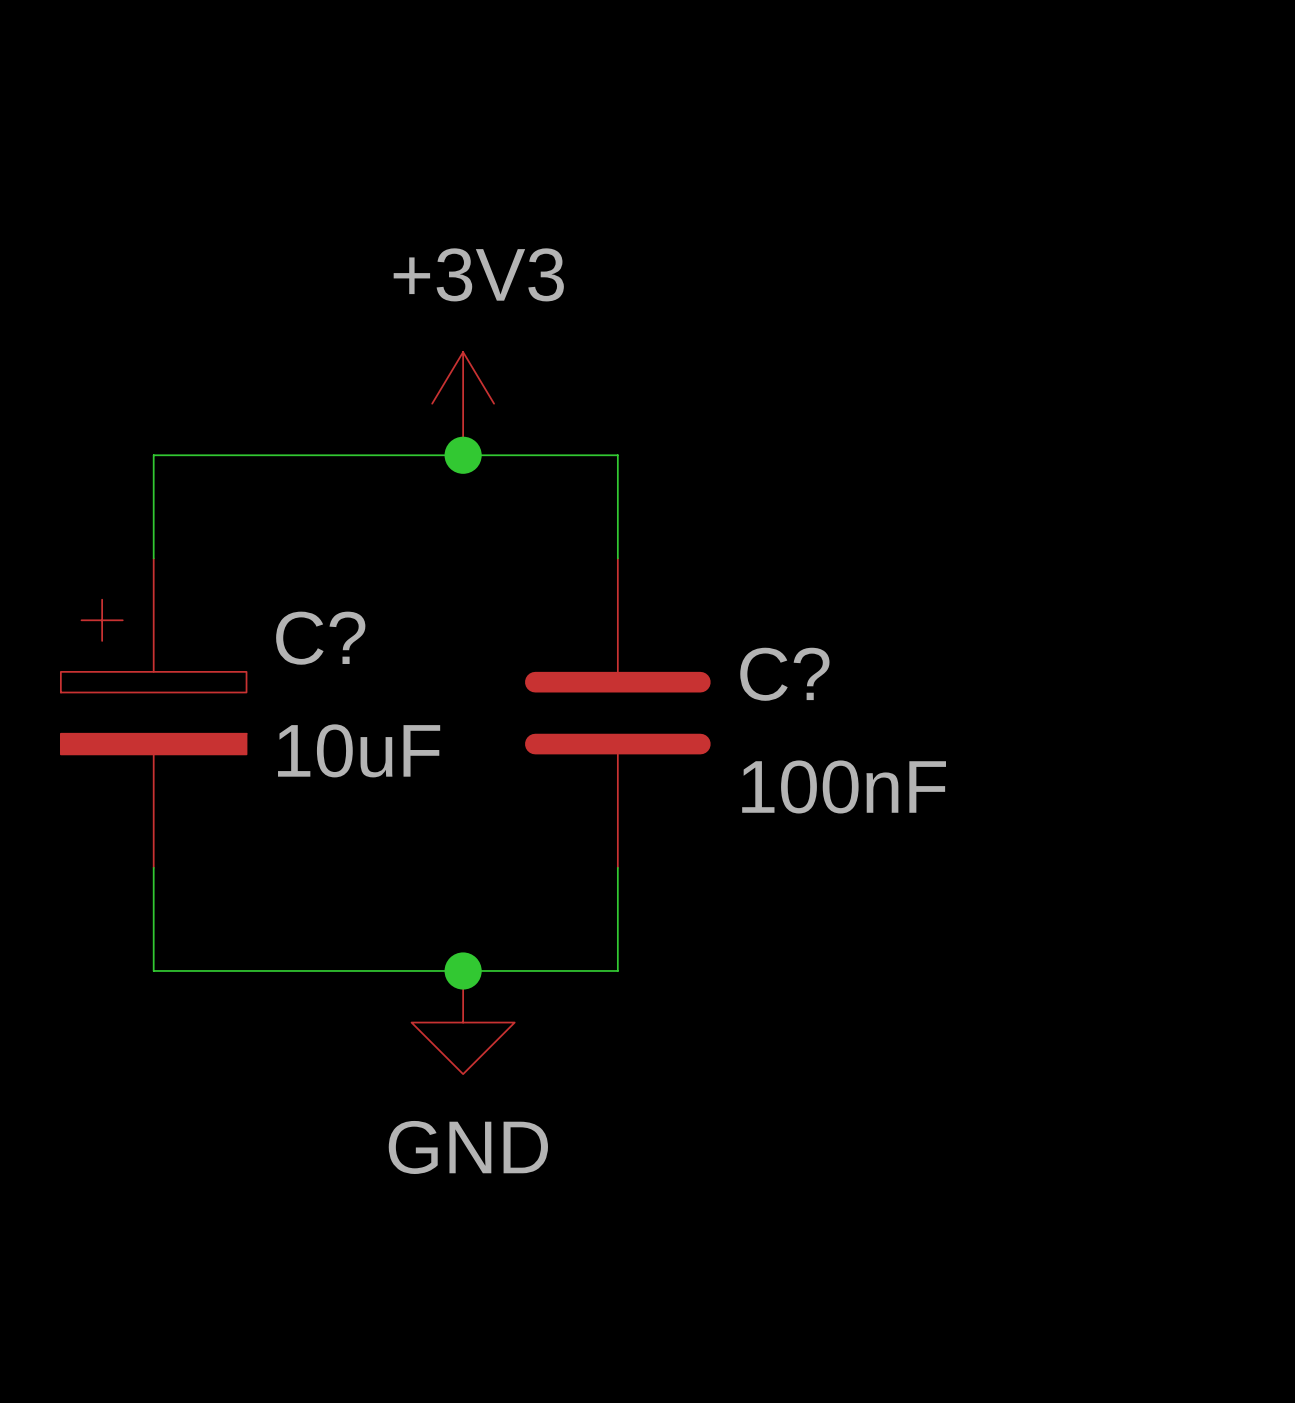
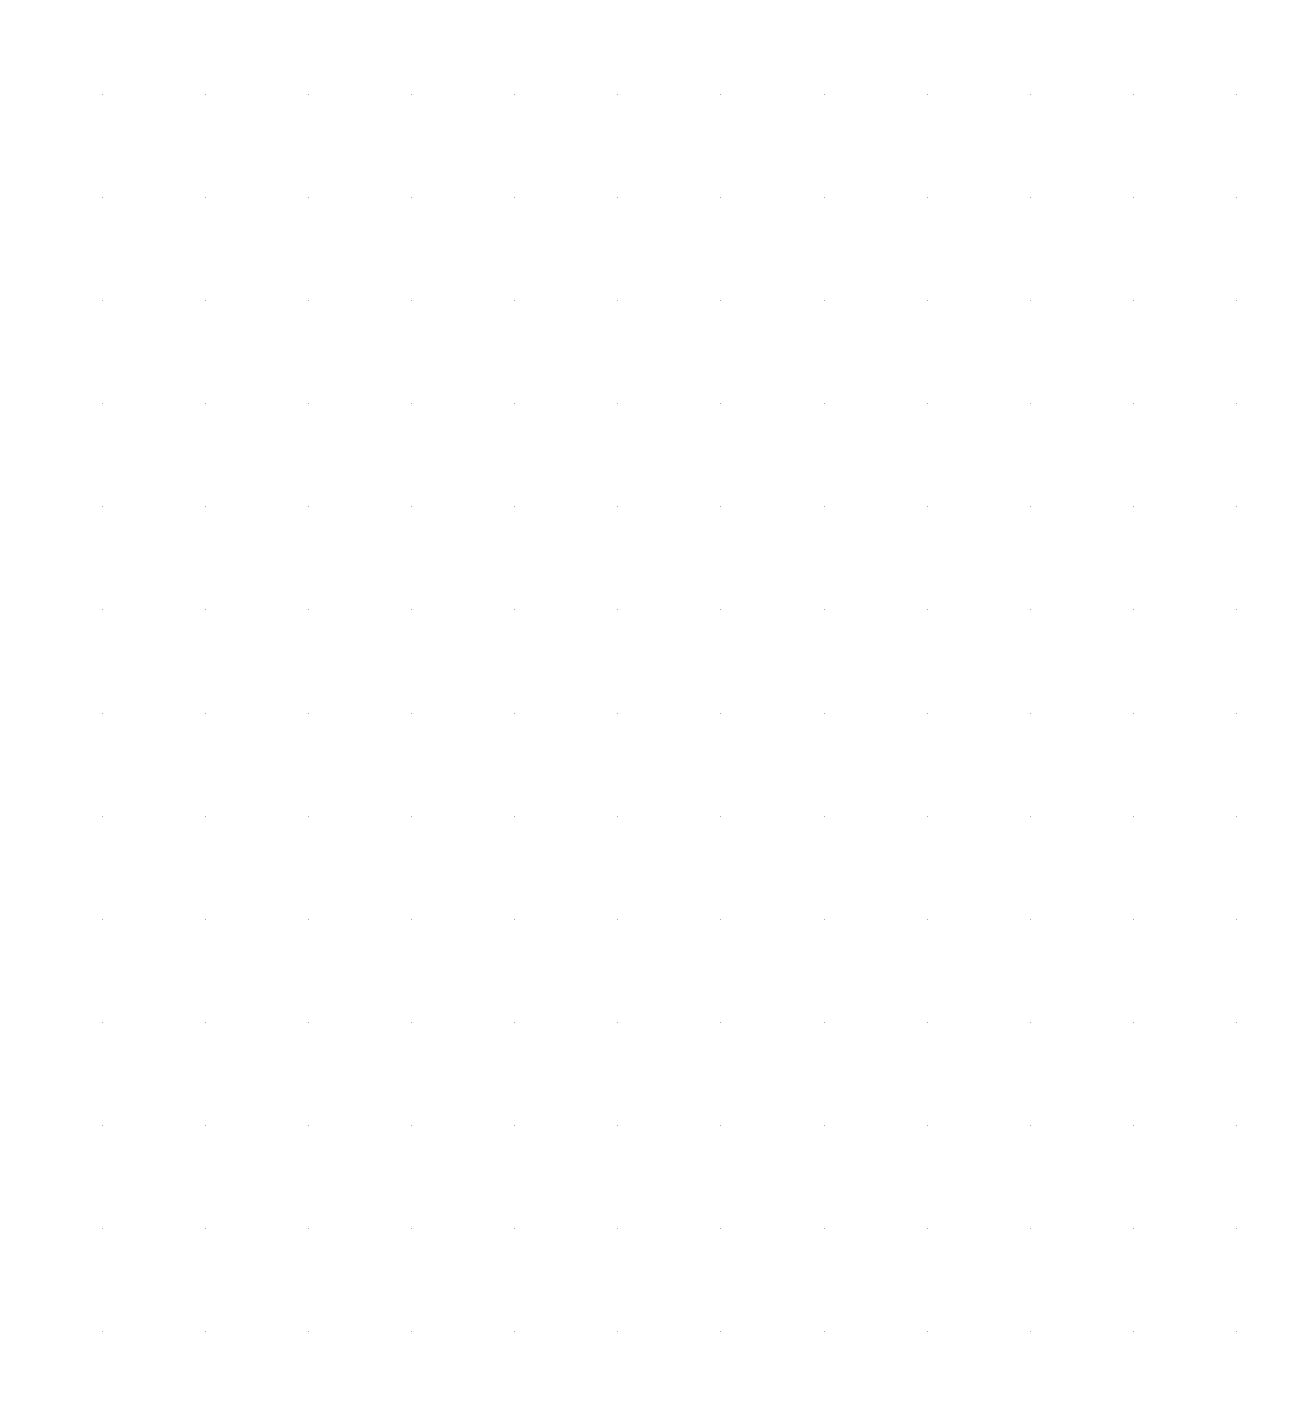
power symbol: +3V3 (463, 403) -> none
junction: (463, 455) -> none
wire: (153, 558) (153, 455) (617, 455) (617, 558) -> none
C?: 10uF (153, 713) -> none
C?: 100nF (617, 713) -> none
wire: (153, 867) (153, 970) (617, 970) (617, 867) -> none
junction: (463, 970) -> none
power symbol: GND (463, 1022) -> none

